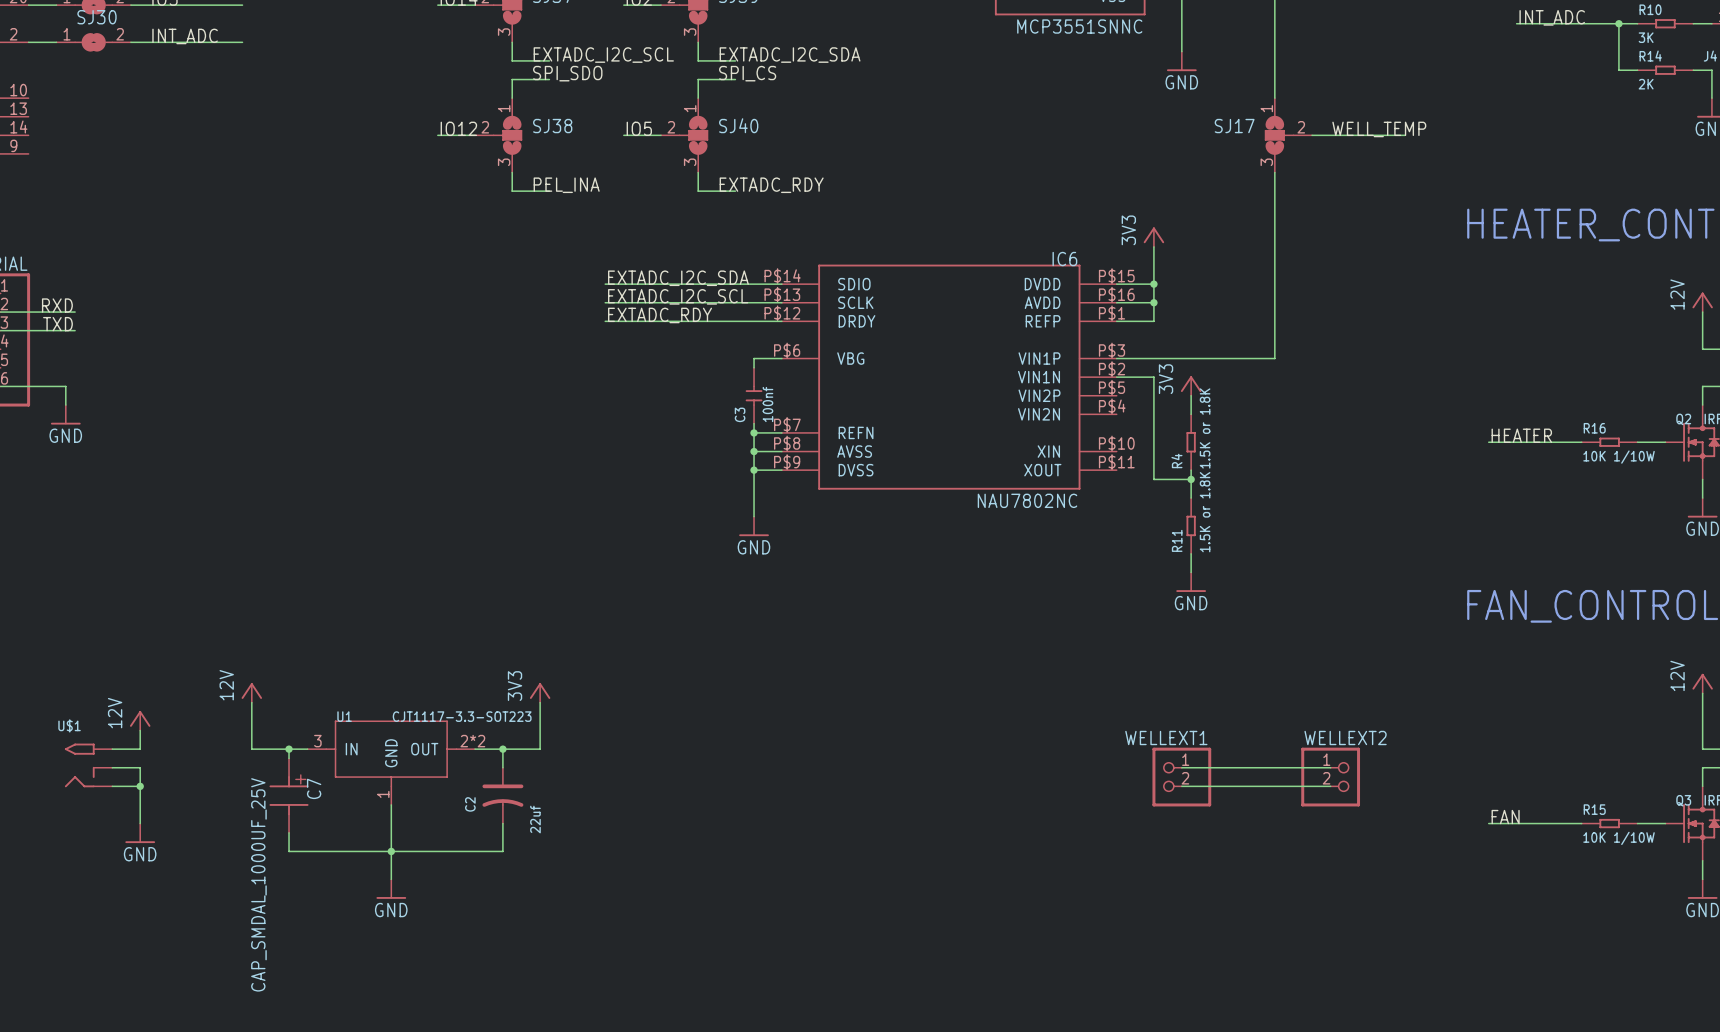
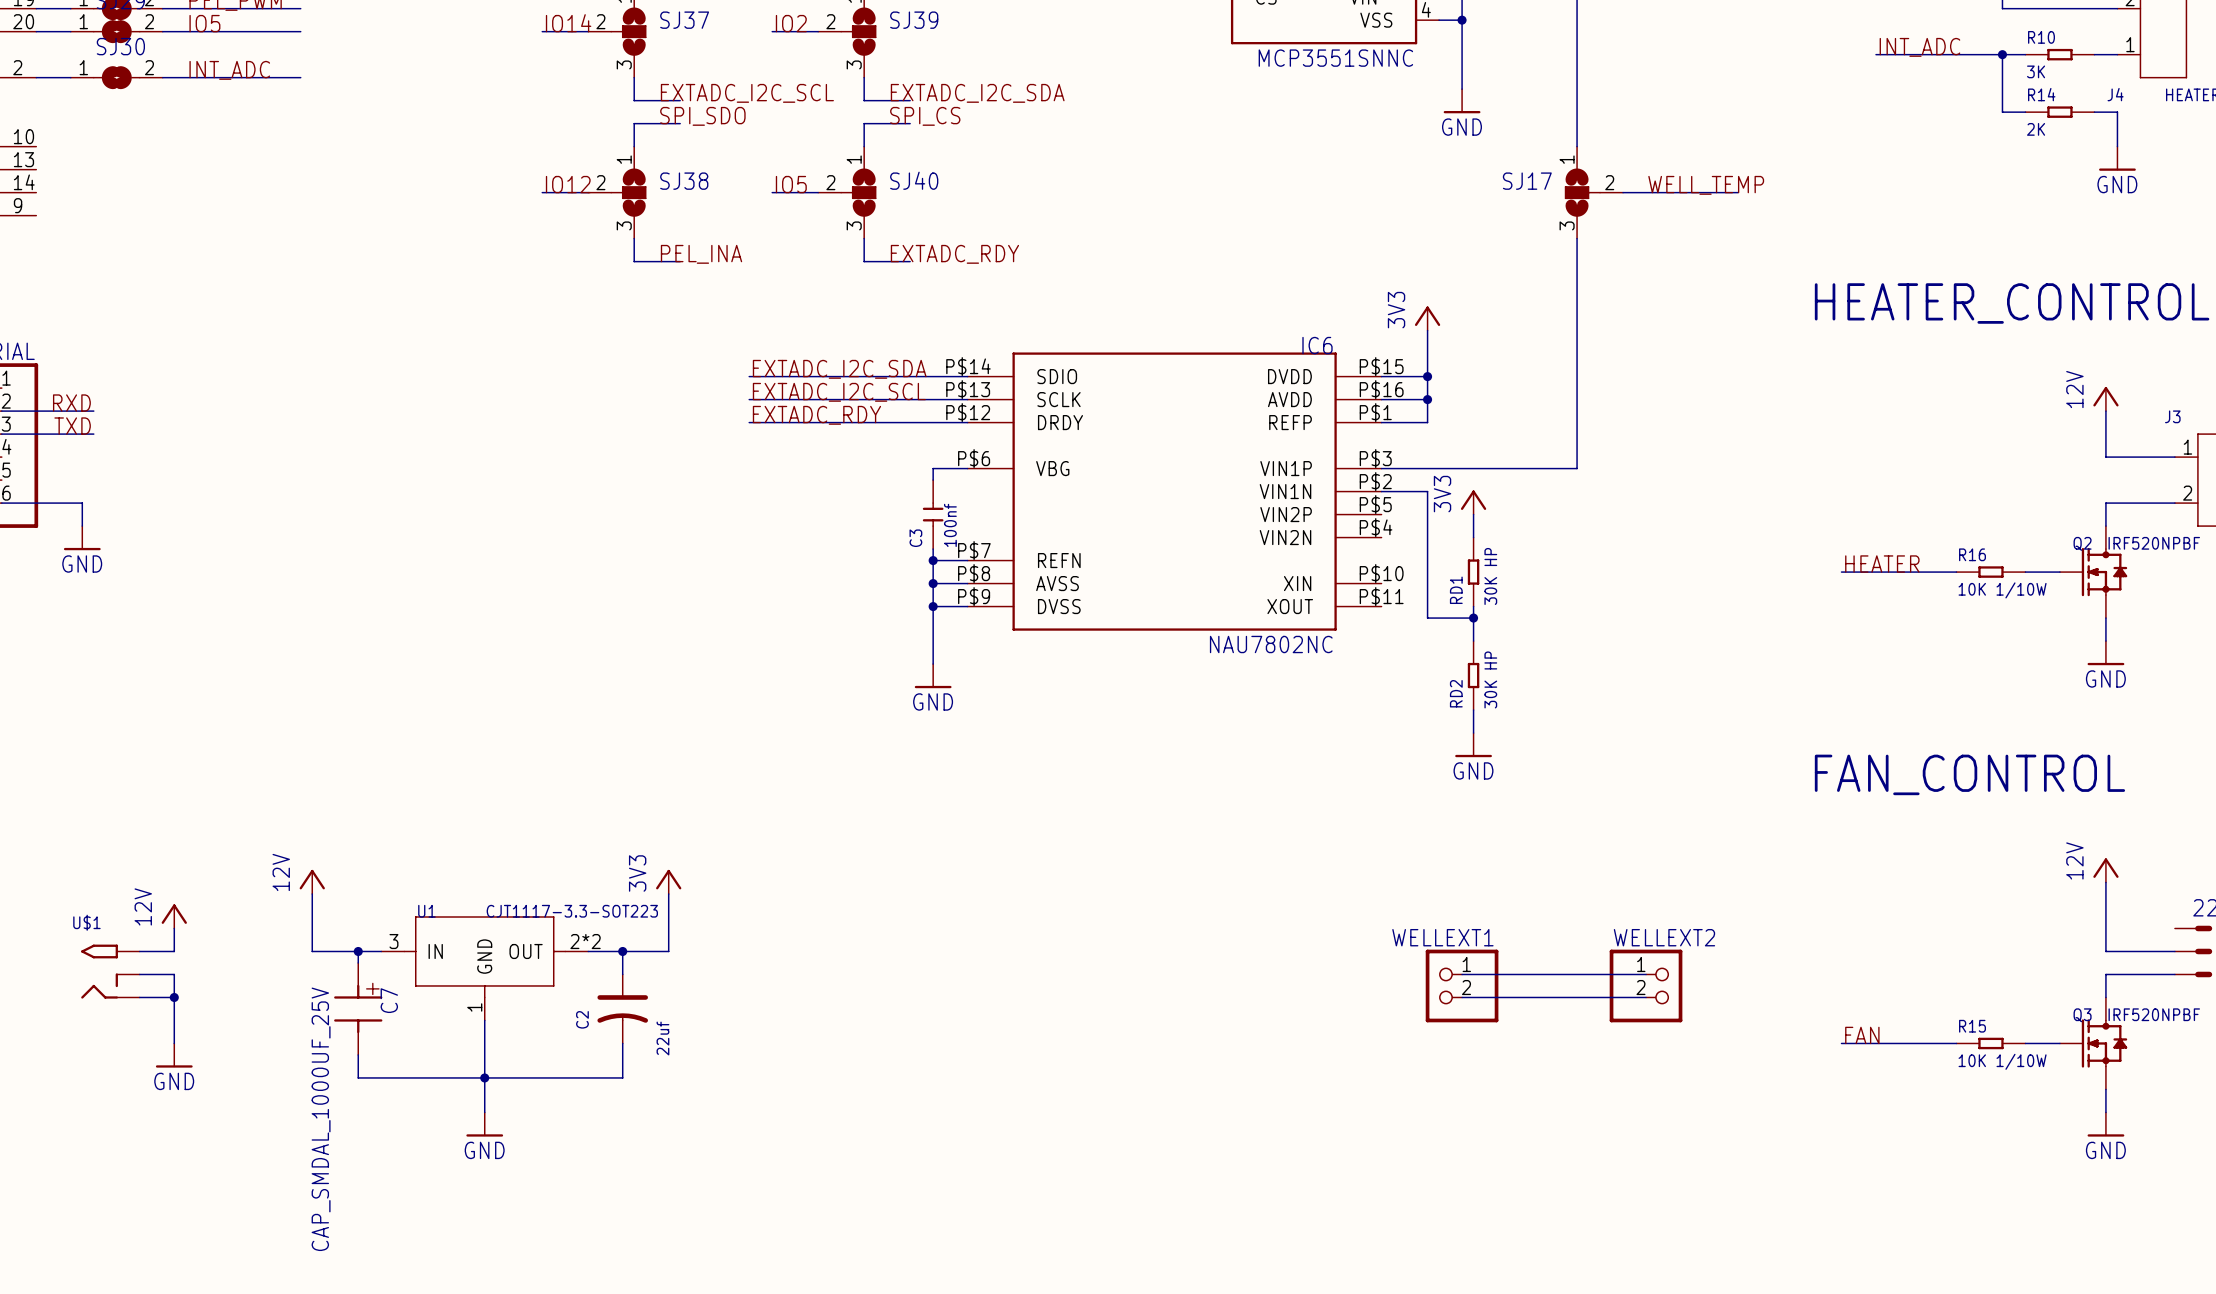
R4 value: 1.5K or 1.8K (1205, 428) -> 30K HP (1490, 576)
R4 name: R4 (1176, 460) -> RD1 (1456, 590)
R11 value: 1.5K or 1.8K (1205, 512) -> 30K HP (1490, 679)
R11 name: R11 (1177, 540) -> RD2 (1456, 693)

